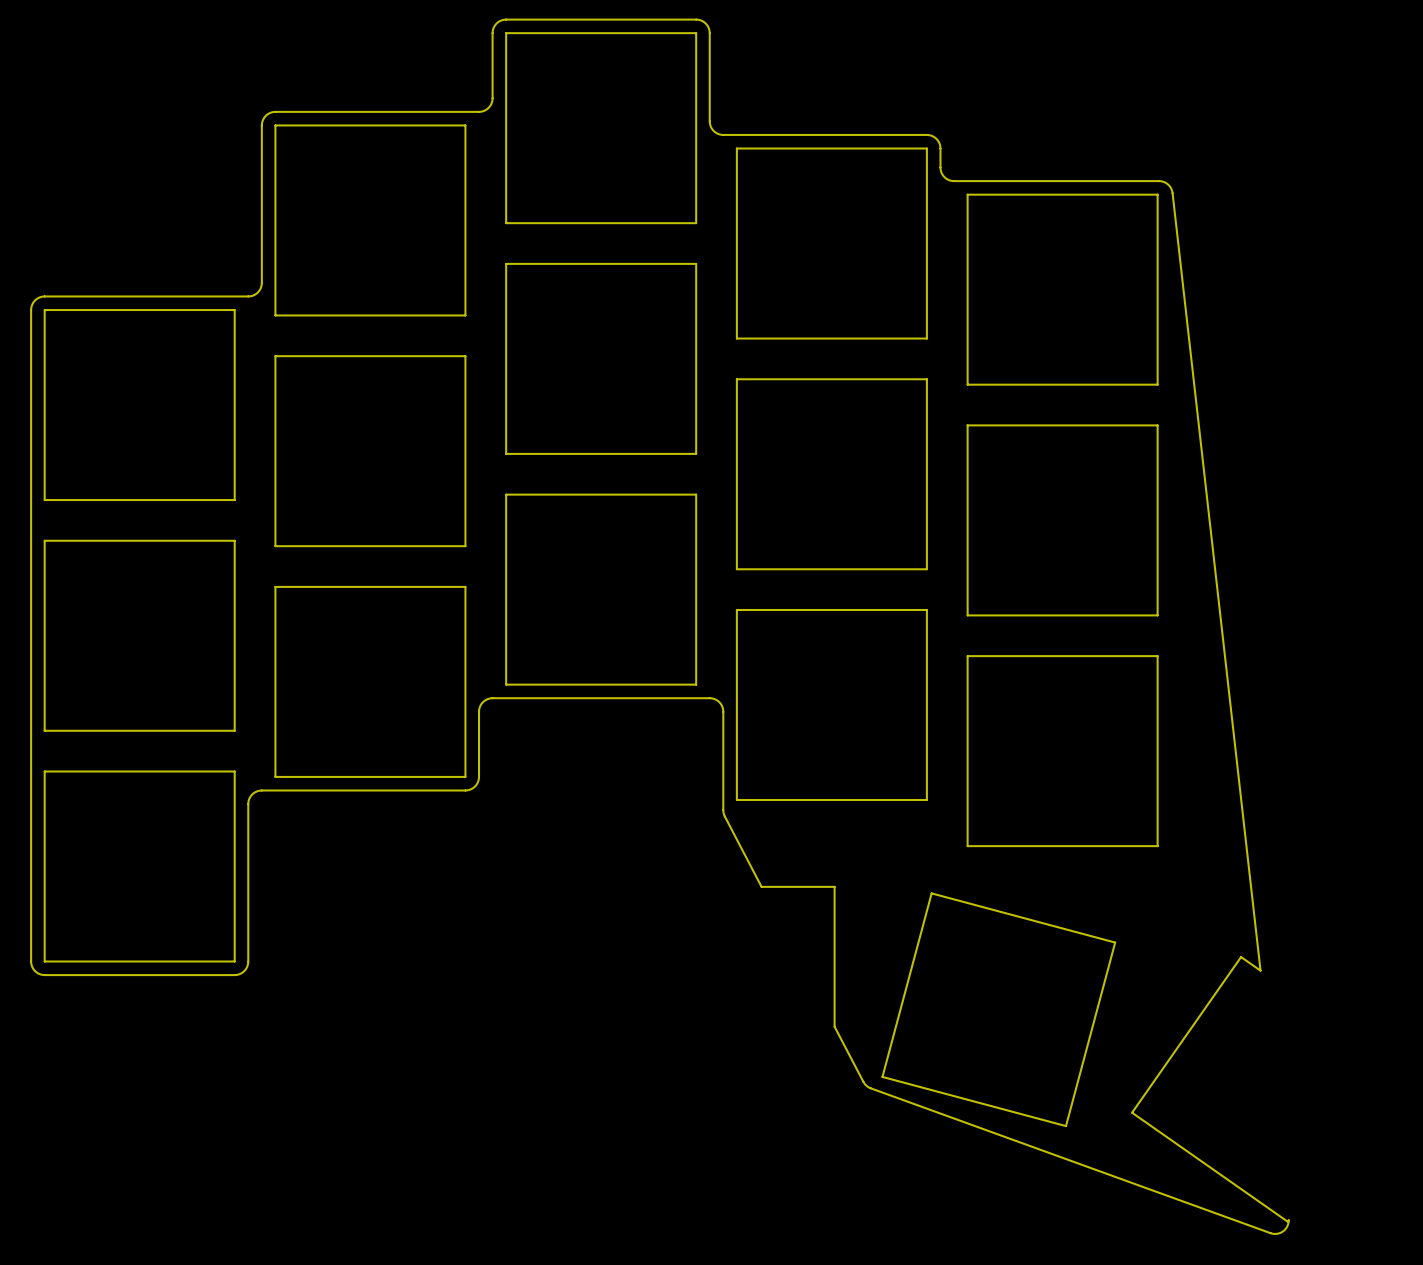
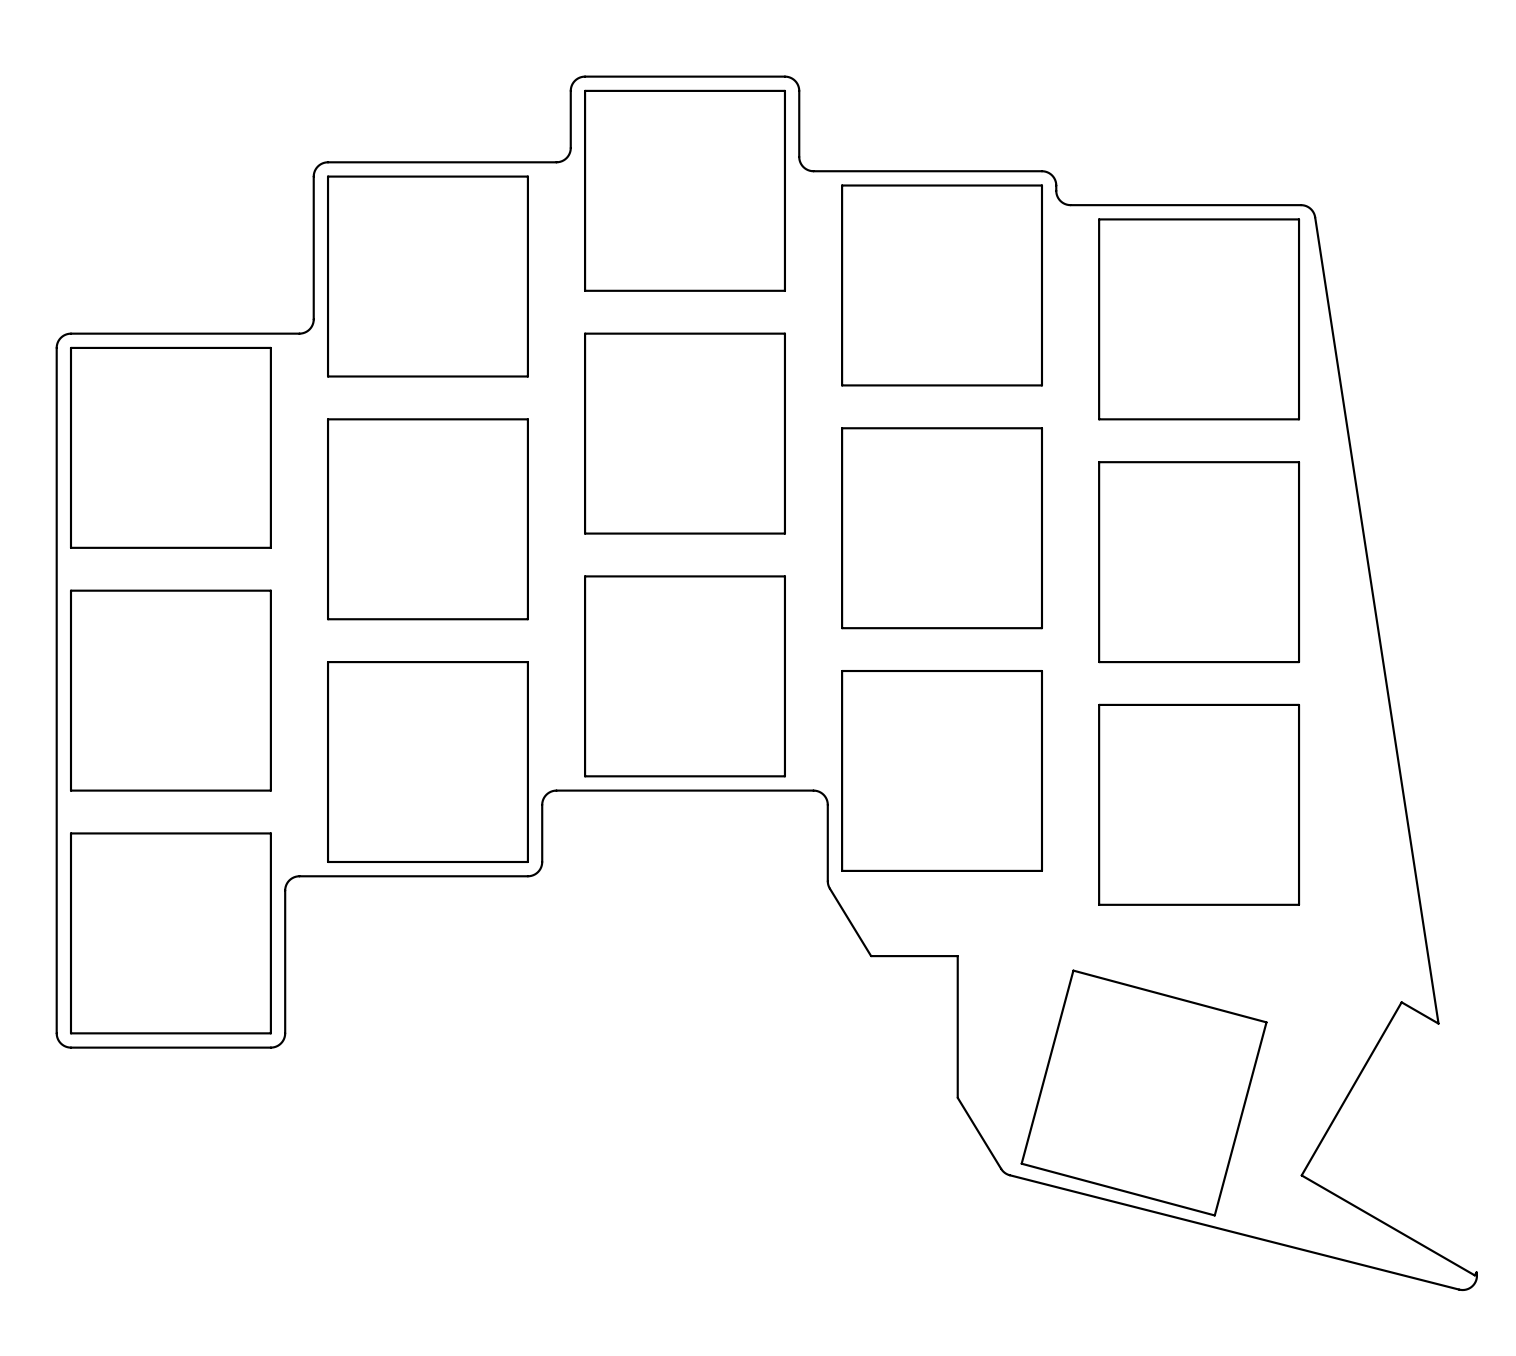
board edge: (506, 33) (506, 223) (696, 223) (696, 33) (506, 33) -> (585, 90) (585, 290) (784, 290) (784, 90) (585, 90)
board edge: (275, 147) (275, 125) (465, 125) (465, 315) (275, 315) (275, 282) -> (285, 333) (306, 331) (311, 326) (313, 319)
board edge: none -> (313, 176) (317, 166) (328, 162) (561, 161) (567, 156) (570, 149) (571, 87) (574, 80) (581, 77) (784, 76) (793, 79) (798, 87) (799, 158) (802, 165) (809, 170) (1043, 171) (1053, 176) (1058, 198) (1068, 205) (1301, 205) (1310, 208) (1315, 217) (1438, 1023) (1401, 1002) (1301, 1175) (1474, 1275) (1476, 1272) (1476, 1280) (1469, 1288) (1459, 1289) (1004, 1172) (957, 1097) (957, 956) (871, 956) (828, 885) (827, 803) (823, 794) (817, 791) (554, 790) (546, 794) (542, 801) (542, 863) (539, 870) (533, 875) (299, 876) (289, 880) (285, 890)
board edge: (736, 148) (736, 338) (926, 338) (926, 148) (736, 148) -> (1099, 219) (1099, 419) (1299, 419) (1299, 219) (1099, 219)
board edge: (967, 194) (1157, 194) (1157, 384) (967, 384) (967, 345) -> (1041, 226) (1041, 185) (842, 185) (842, 385) (1041, 385)
board edge: (506, 263) (506, 453) (696, 453) (696, 263) (506, 263) -> (585, 333) (585, 533) (784, 533) (784, 333) (585, 333)
board edge: (248, 296) (257, 292) (261, 284) (261, 125) (265, 115) (275, 111) (484, 110) (489, 106) (492, 100) (493, 29) (496, 23) (504, 19) (696, 19) (702, 21) (709, 31) (709, 123) (712, 129) (719, 134) (928, 135) (935, 137) (939, 143) (940, 171) (944, 177) (950, 180) (1159, 181) (1168, 184) (1172, 193) (1260, 970) (1241, 957) (1132, 1112) (1287, 1221) (1288, 1220) (1285, 1229) (1278, 1233) (1270, 1233) (866, 1085) (834, 1026) (834, 886) (761, 886) (723, 813) (723, 717) -> none
board edge: (275, 356) (275, 546) (465, 546) (465, 356) (275, 356) -> (328, 176) (328, 376) (527, 376) (527, 176) (328, 176)
board edge: (736, 379) (736, 569) (926, 569) (926, 379) (736, 379) -> (1099, 462) (1099, 662) (1299, 662) (1299, 462) (1099, 462)
board edge: (967, 425) (1157, 425) (1157, 615) (967, 615) (967, 576) -> (1041, 469) (1041, 428) (842, 428) (842, 628) (1041, 628)
board edge: (506, 494) (696, 494) (696, 684) (506, 684) (506, 494) -> none
board edge: (275, 586) (465, 586) (465, 776) (275, 776) (275, 586) -> (328, 419) (527, 419) (527, 619) (328, 619) (328, 419)
board edge: (736, 609) (926, 609) (926, 800) (736, 800) (736, 609) -> (1099, 704) (1299, 704) (1299, 904) (1099, 904) (1099, 704)
board edge: (967, 656) (1157, 656) (1157, 846) (967, 846) (967, 807) -> (1041, 712) (1041, 671) (842, 671) (842, 870) (1041, 870)
board edge: (479, 711) (482, 702) (492, 698) (709, 698) (719, 702) (723, 711) -> (784, 776) (585, 776) (585, 576) (784, 576) (784, 770)
board edge: (479, 776) (475, 786) (465, 790) (258, 790) (252, 794) (248, 800) (248, 825) -> (527, 839) (527, 861) (328, 861) (328, 662) (527, 662) (527, 770)
board edge: (931, 893) (1115, 942) (1066, 1126) (882, 1076) (931, 893) -> (1073, 970) (1266, 1022) (1214, 1215) (1021, 1163) (1073, 970)

